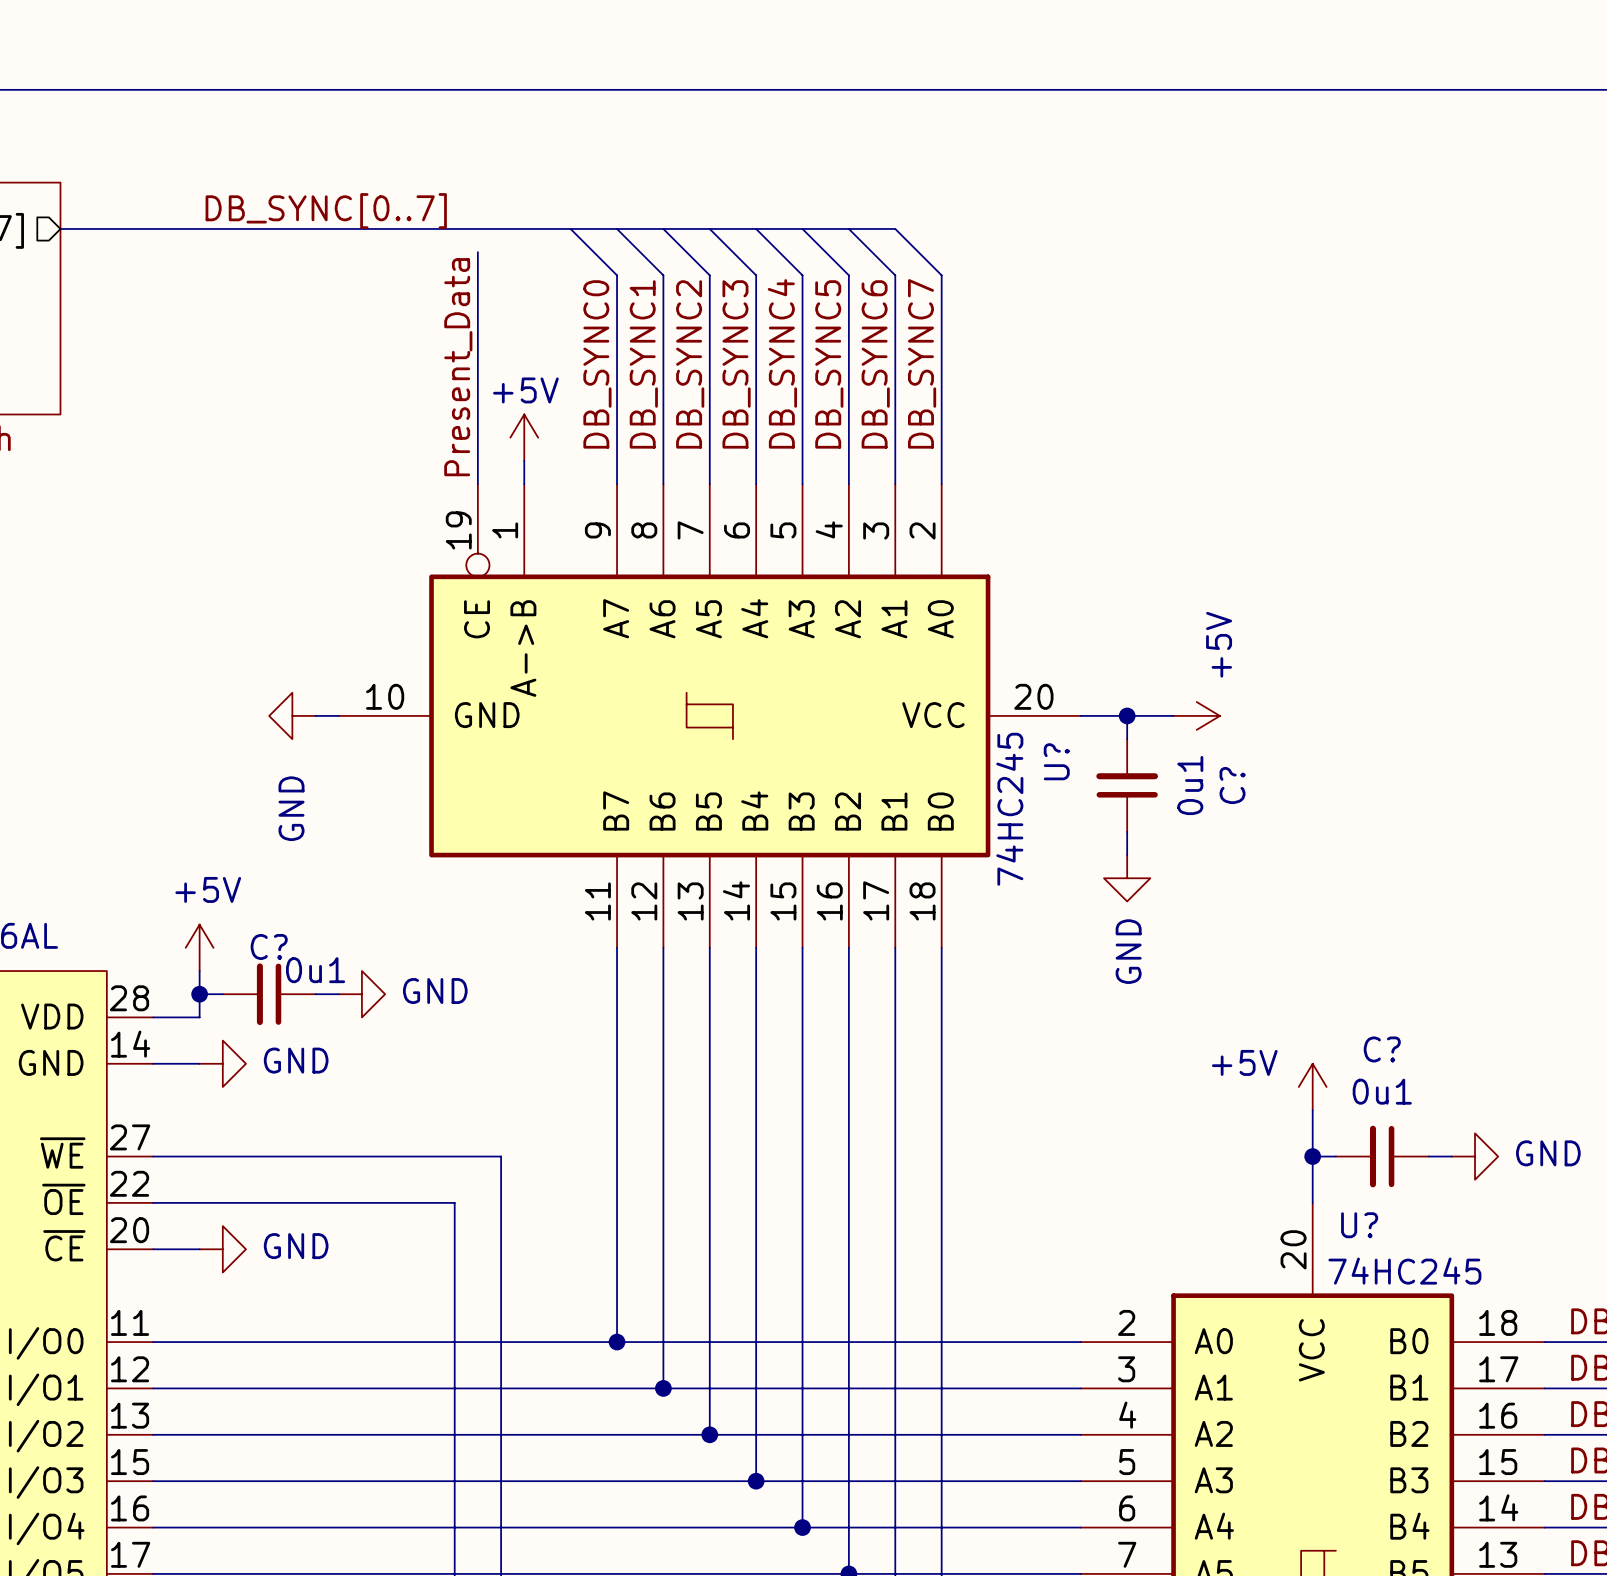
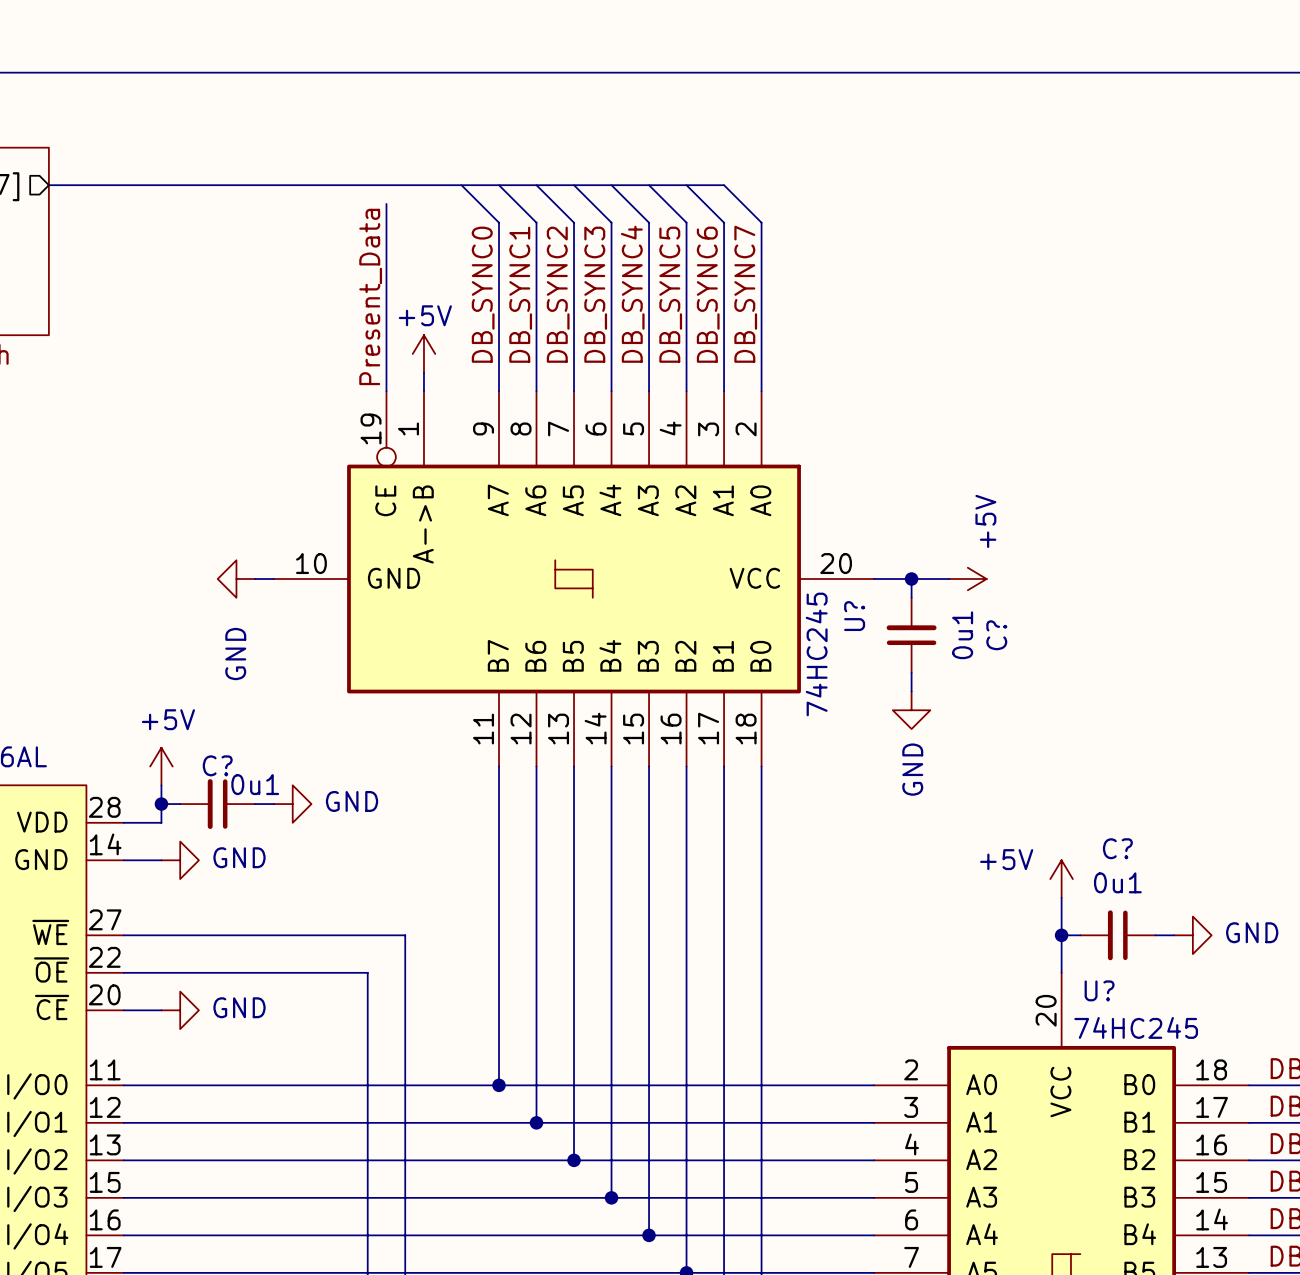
label: DB_SYNC[0..7] (326, 211) -> none

